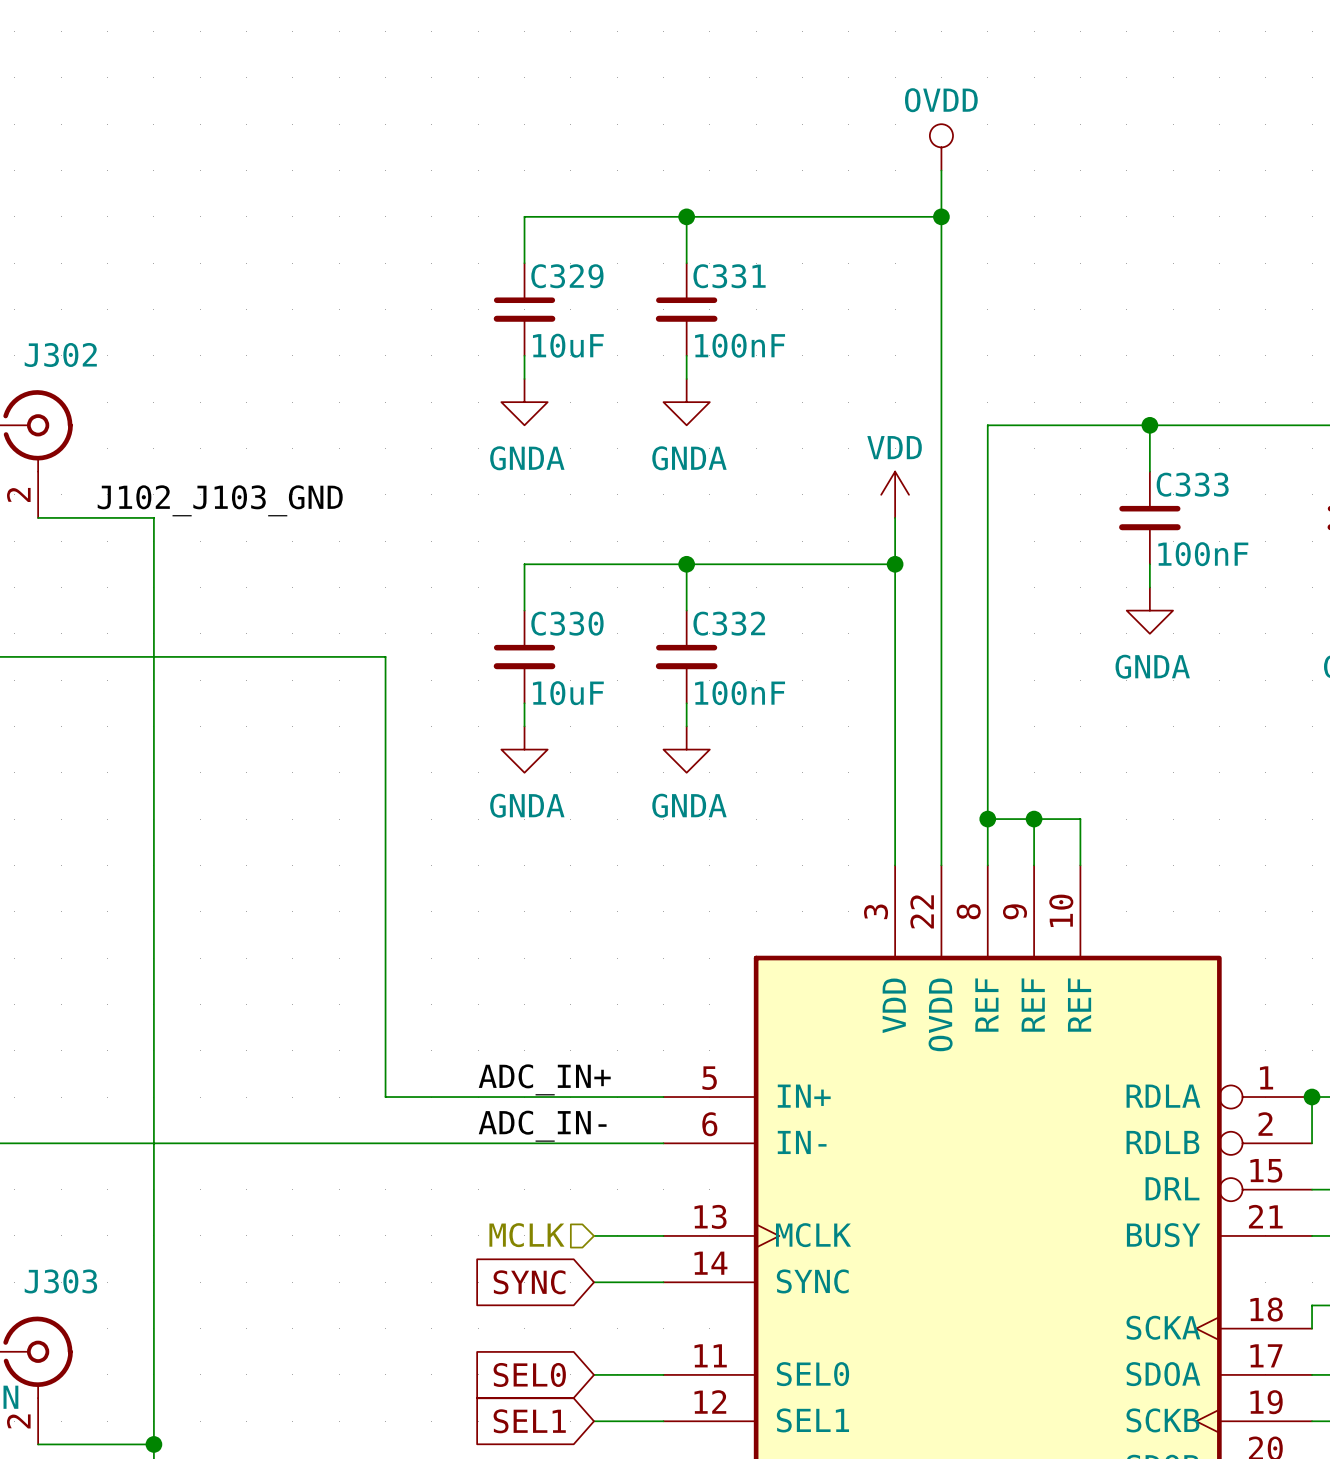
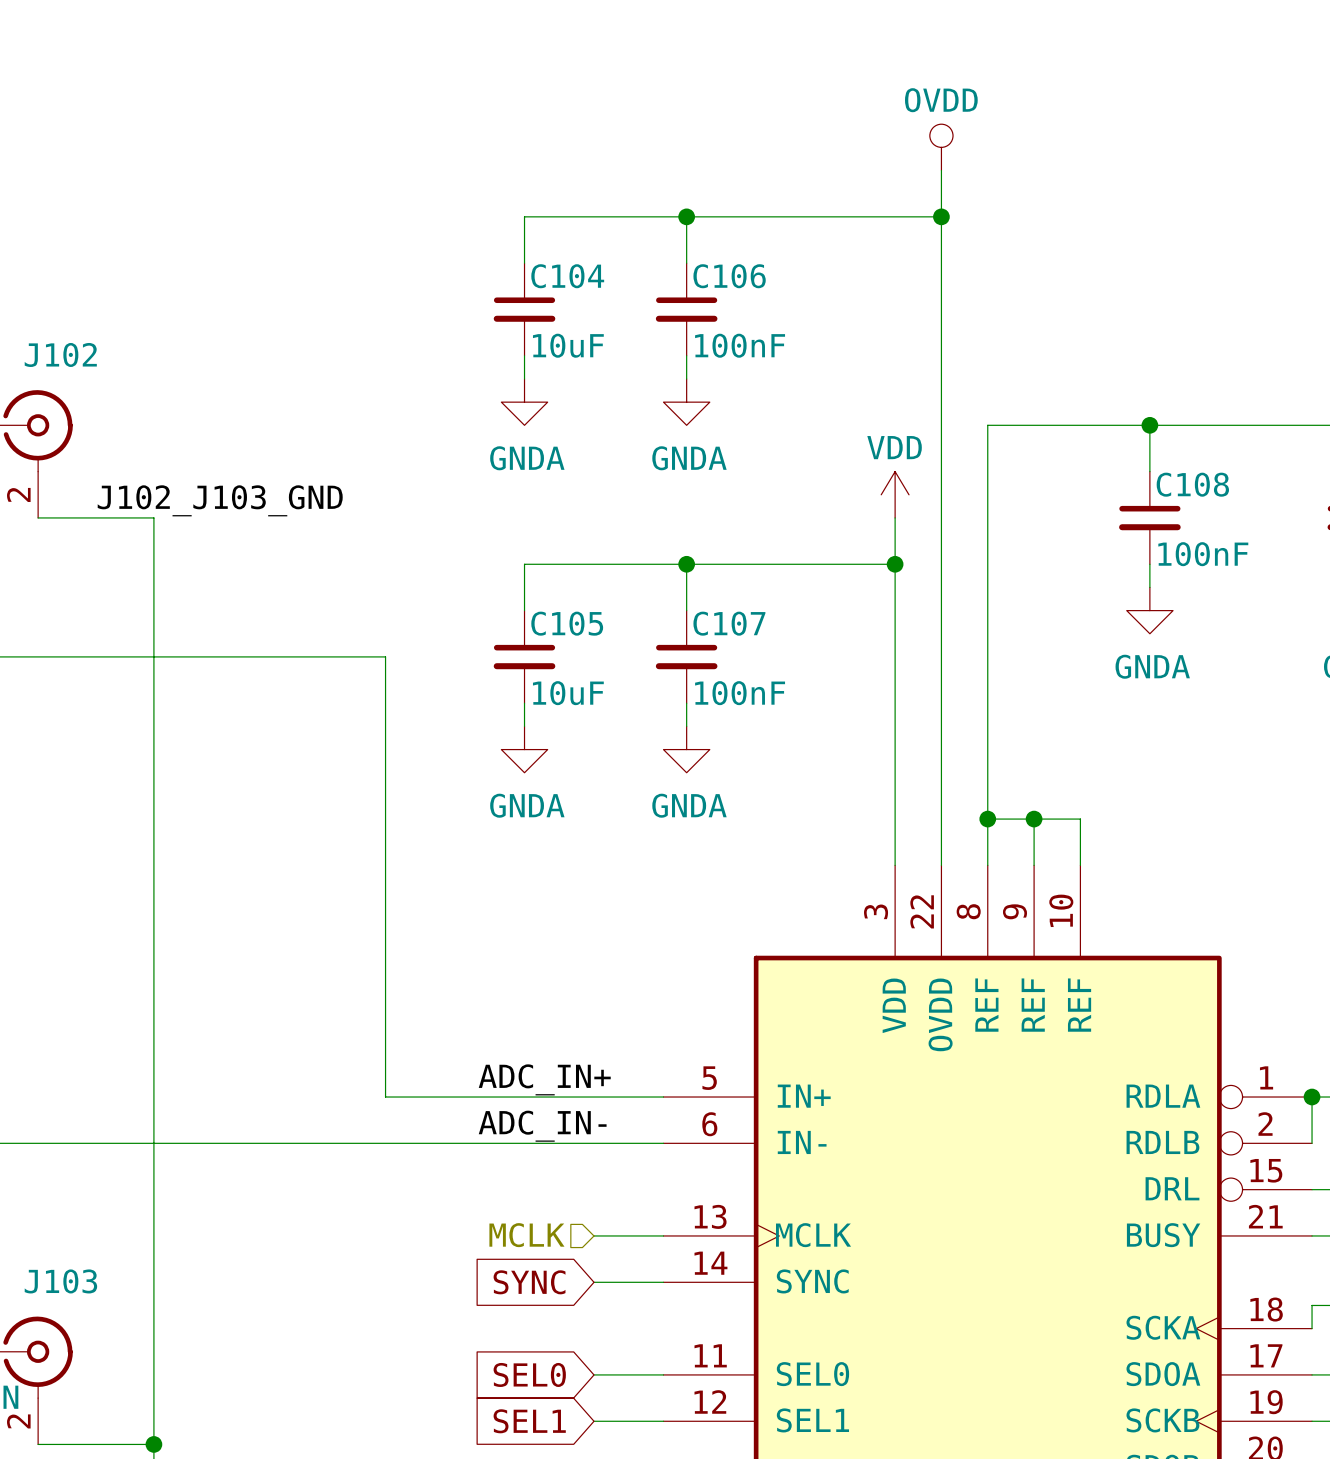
C329 name: C329 (567, 276) -> C104 (567, 276)
C331 name: C331 (729, 276) -> C106 (729, 276)
J302 name: J302 (60, 354) -> J102 (60, 354)
C333 name: C333 (1192, 484) -> C108 (1192, 484)
C330 name: C330 (567, 623) -> C105 (567, 623)
C332 name: C332 (729, 623) -> C107 (729, 623)
J303 name: J303 (60, 1281) -> J103 (60, 1281)

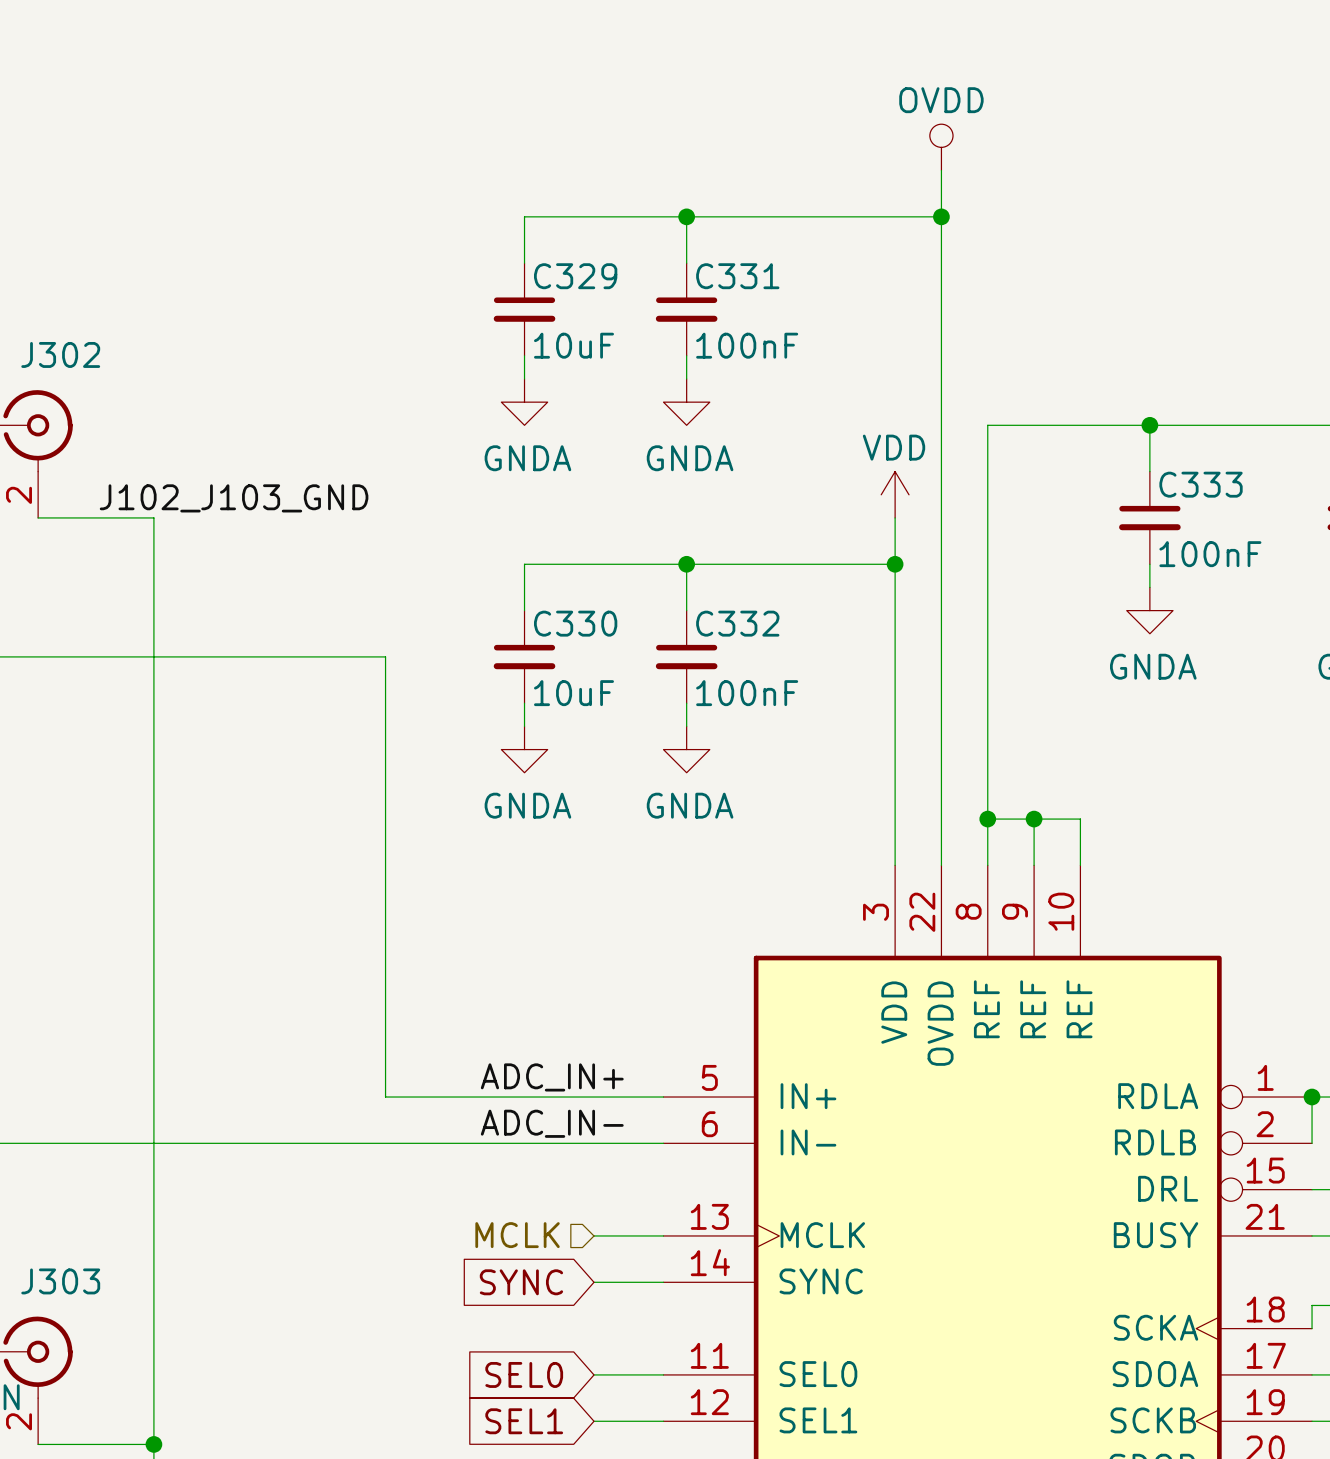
C104 name: C104 (567, 276) -> C329 (575, 276)
C106 name: C106 (729, 276) -> C331 (737, 276)
J102 name: J102 (60, 354) -> J302 (60, 354)
C108 name: C108 (1192, 484) -> C333 (1201, 484)
C105 name: C105 (567, 623) -> C330 (575, 623)
C107 name: C107 (729, 623) -> C332 (737, 623)
J103 name: J103 (60, 1281) -> J303 (60, 1281)

